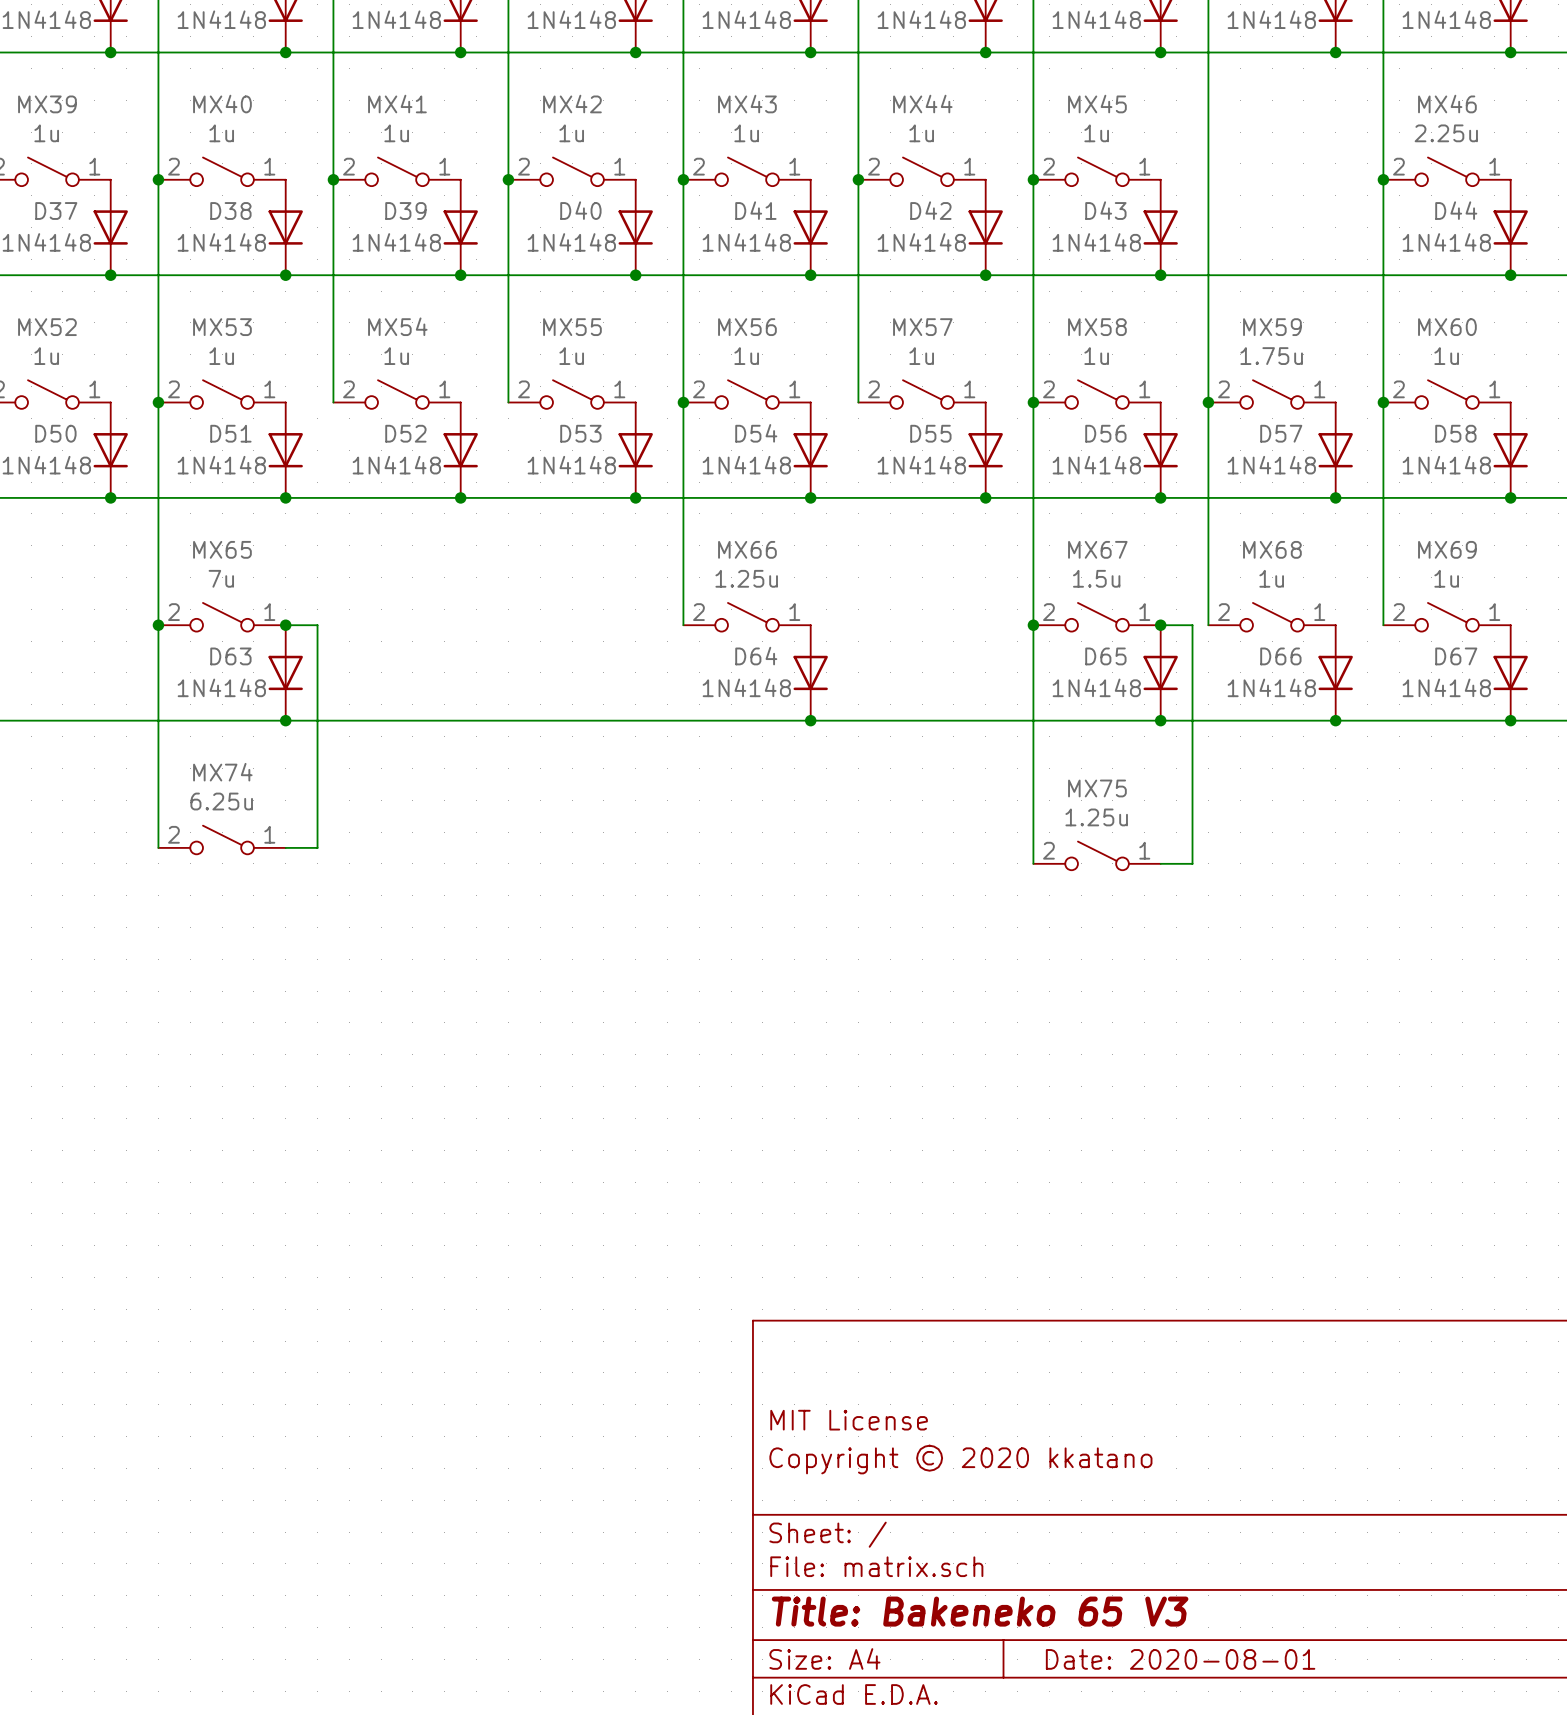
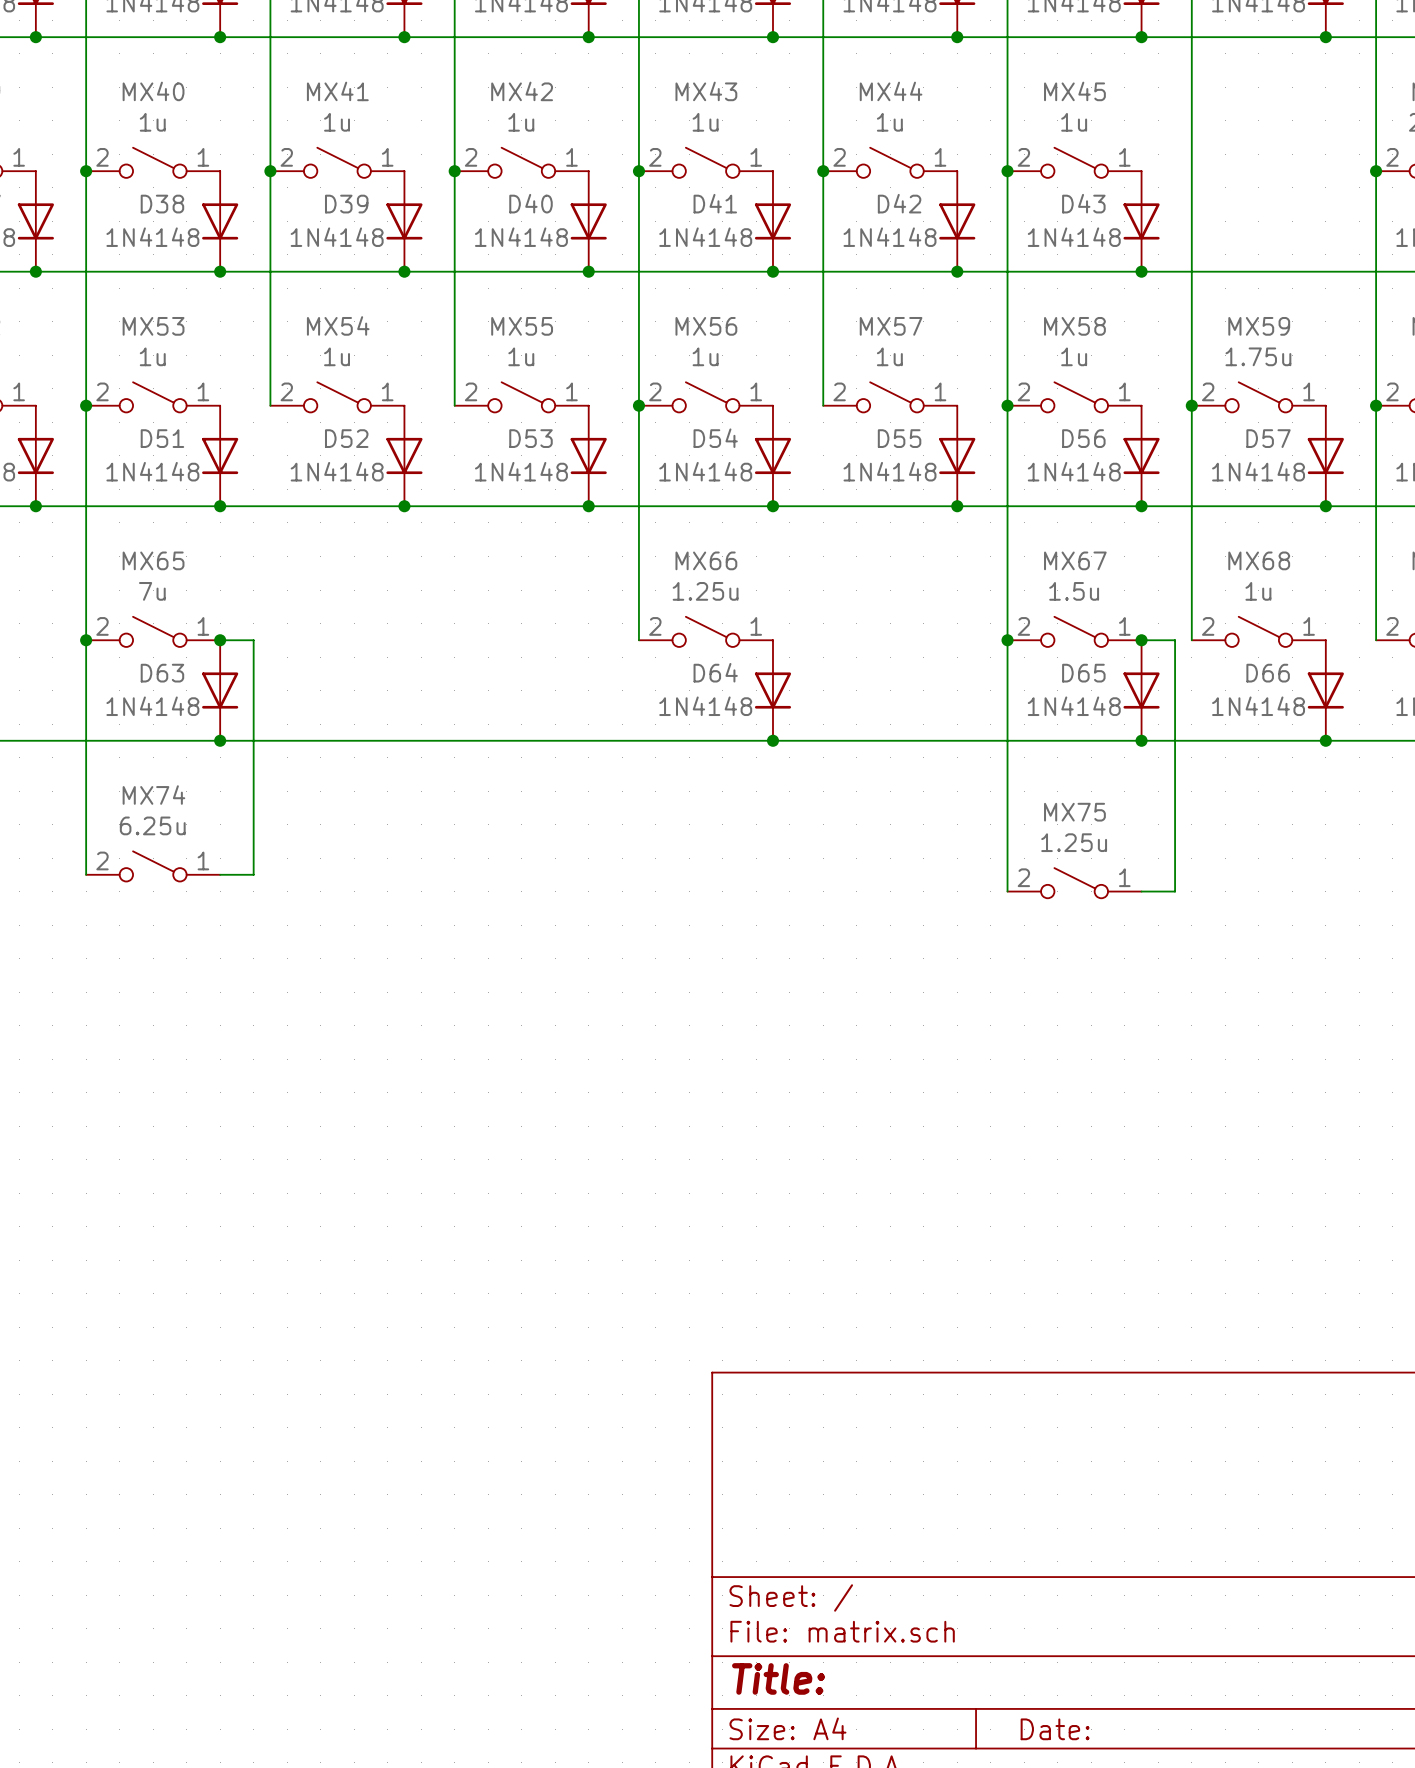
title block: MIT License (849, 1420) -> none
title block: Copyright © 2020 kkatano (960, 1459) -> none
title block: Title: Bakeneko 65 V3 (980, 1611) -> Title: (778, 1678)
title block: Date: 2020-08-01 (1180, 1659) -> Date: (1055, 1729)

